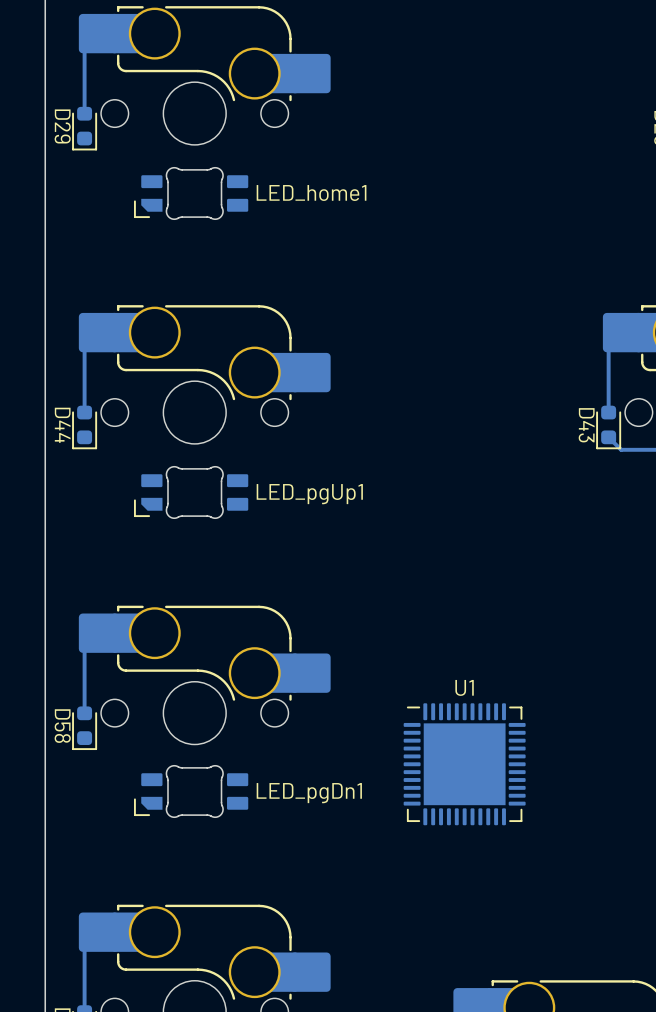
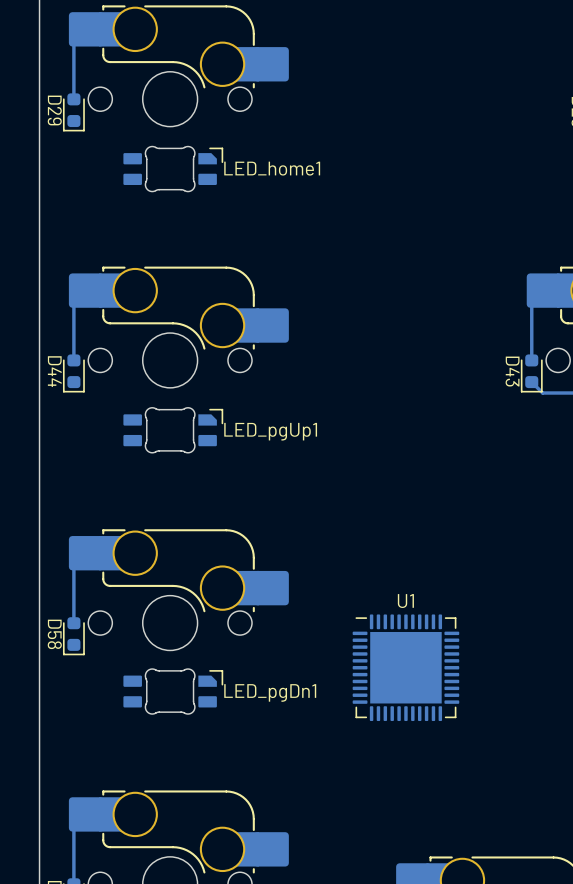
LED_home1 rotation: 0° (191, 193) -> 180° (173, 169)
LED_pgUp1 rotation: 0° (191, 492) -> 180° (173, 430)
LED_pgDn1 rotation: 0° (191, 791) -> 180° (173, 691)

